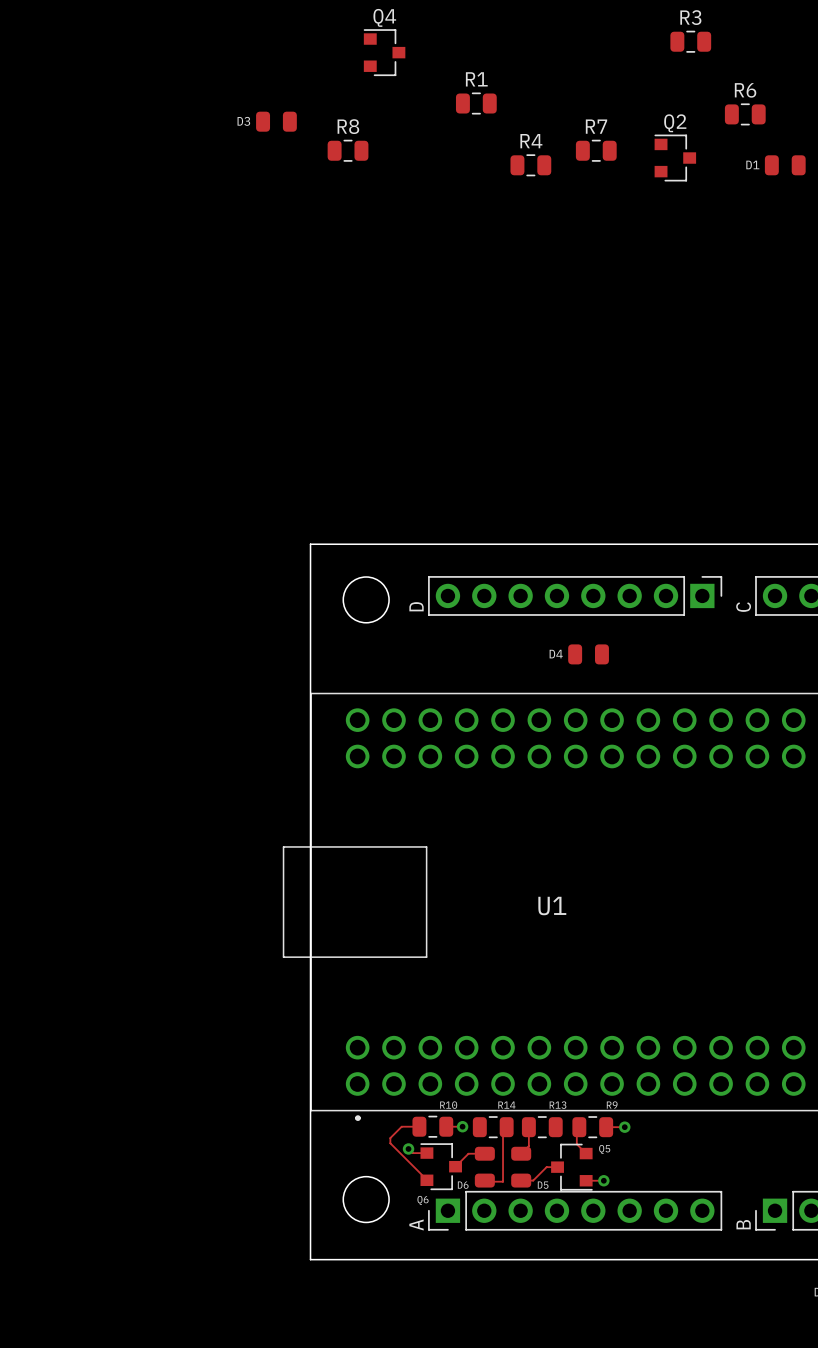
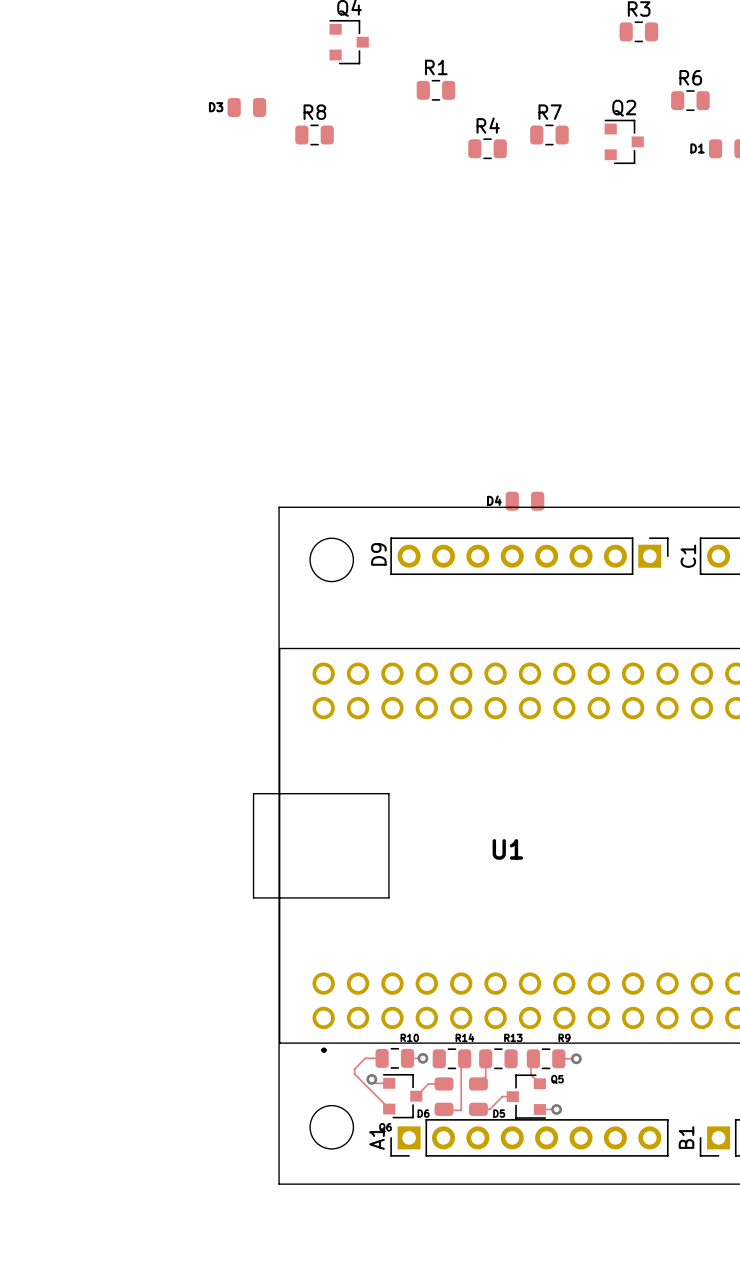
D9 name: none -> D9 (378, 554)
C1 name: none -> C1 (688, 556)
D9 value: D (416, 606) -> none
C1 value: C (743, 607) -> none
D4 position: (588, 654) -> (524, 501)
A1 name: none -> A1 (377, 1138)
B1 name: none -> B1 (686, 1137)
A1 value: A (416, 1224) -> none
B1 value: B (743, 1224) -> none

